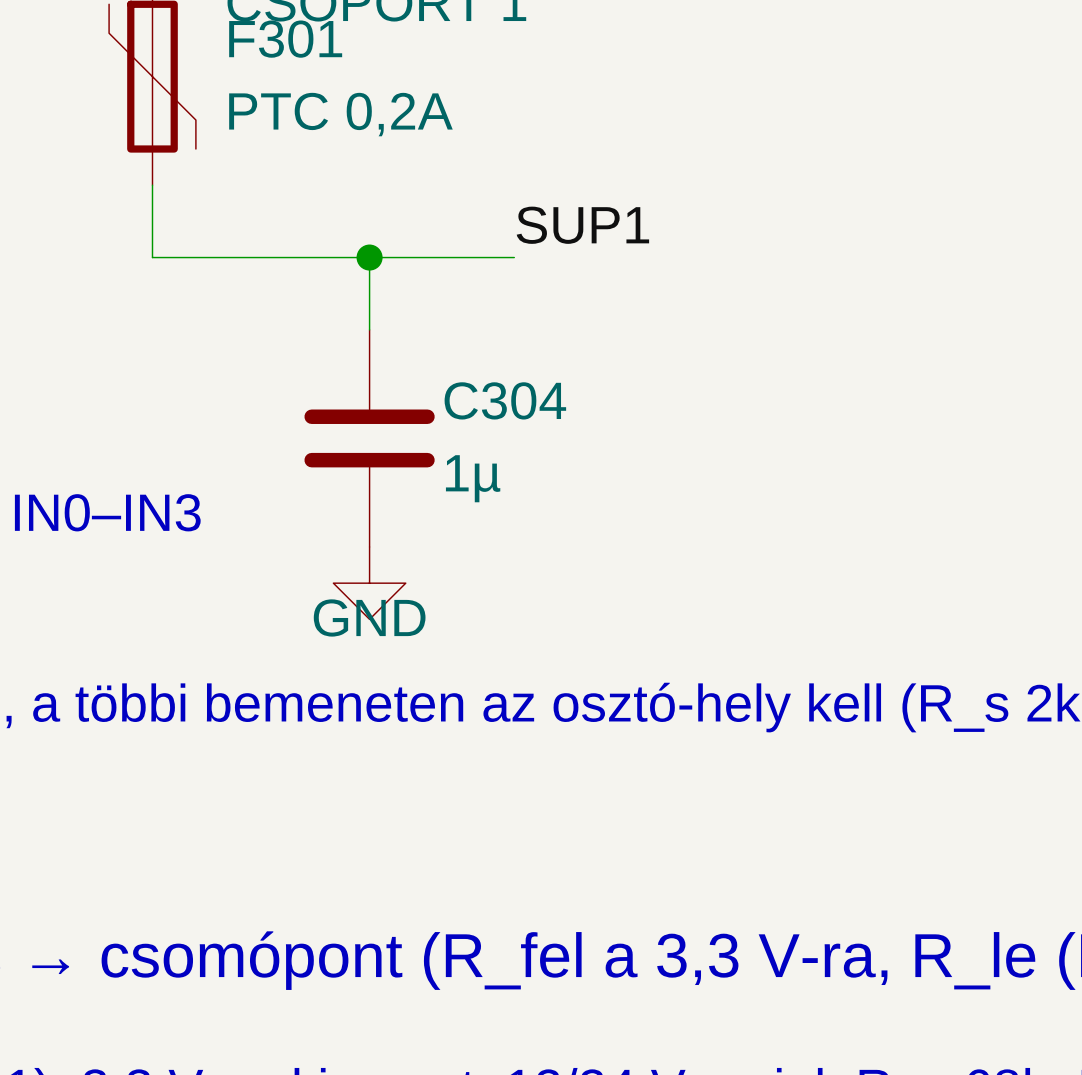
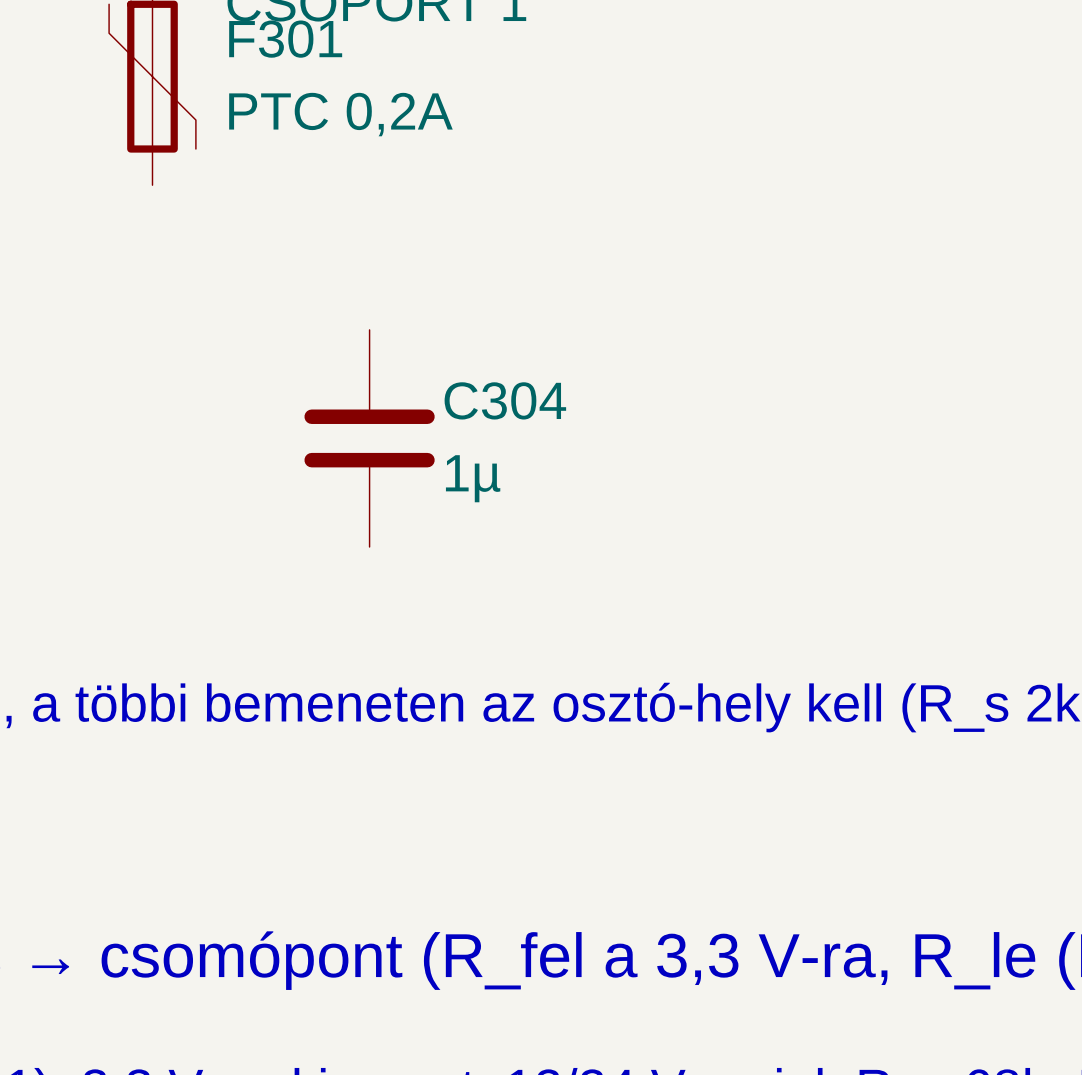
wire: (152, 185) (152, 257) (514, 257) -> none
label: SUP1 (582, 225) -> none
wire: (369, 257) (369, 329) -> none
junction: (369, 257) -> none
text: IN0–IN3 (107, 512) -> none
power symbol: GND (369, 583) -> none

